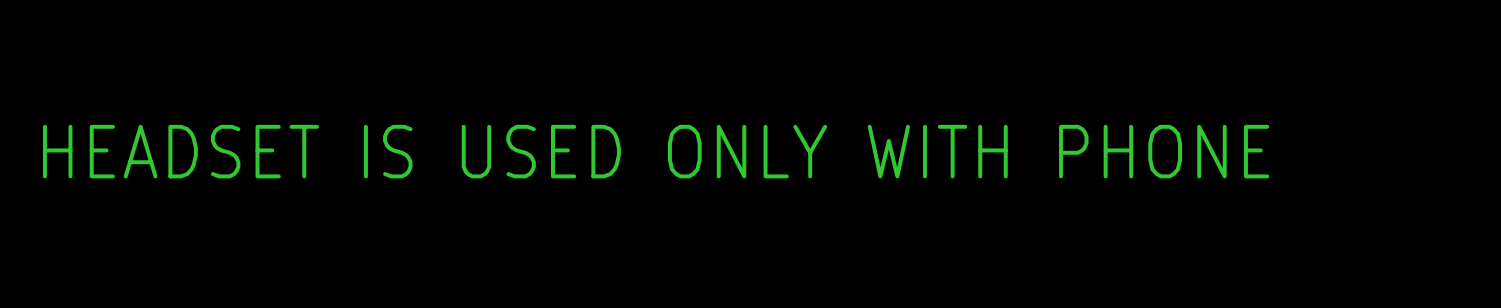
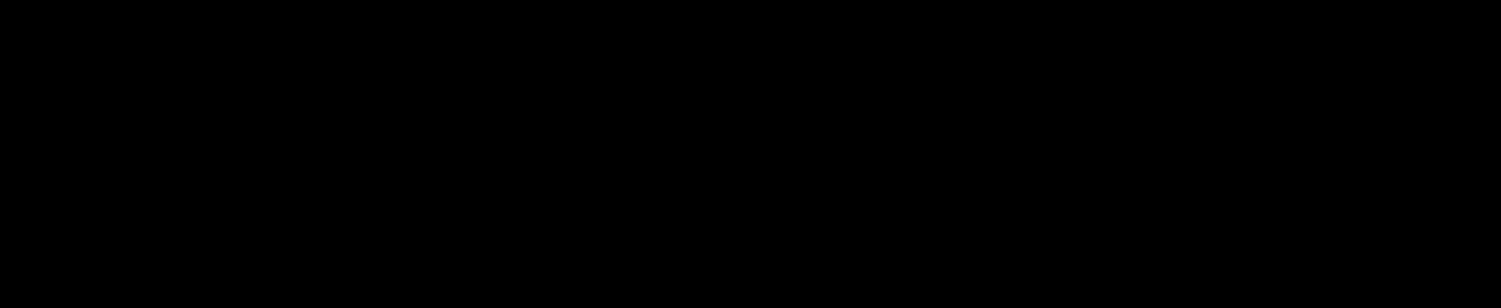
text: HEADSET IS USED ONLY WITH PHONE (656, 151) -> none

